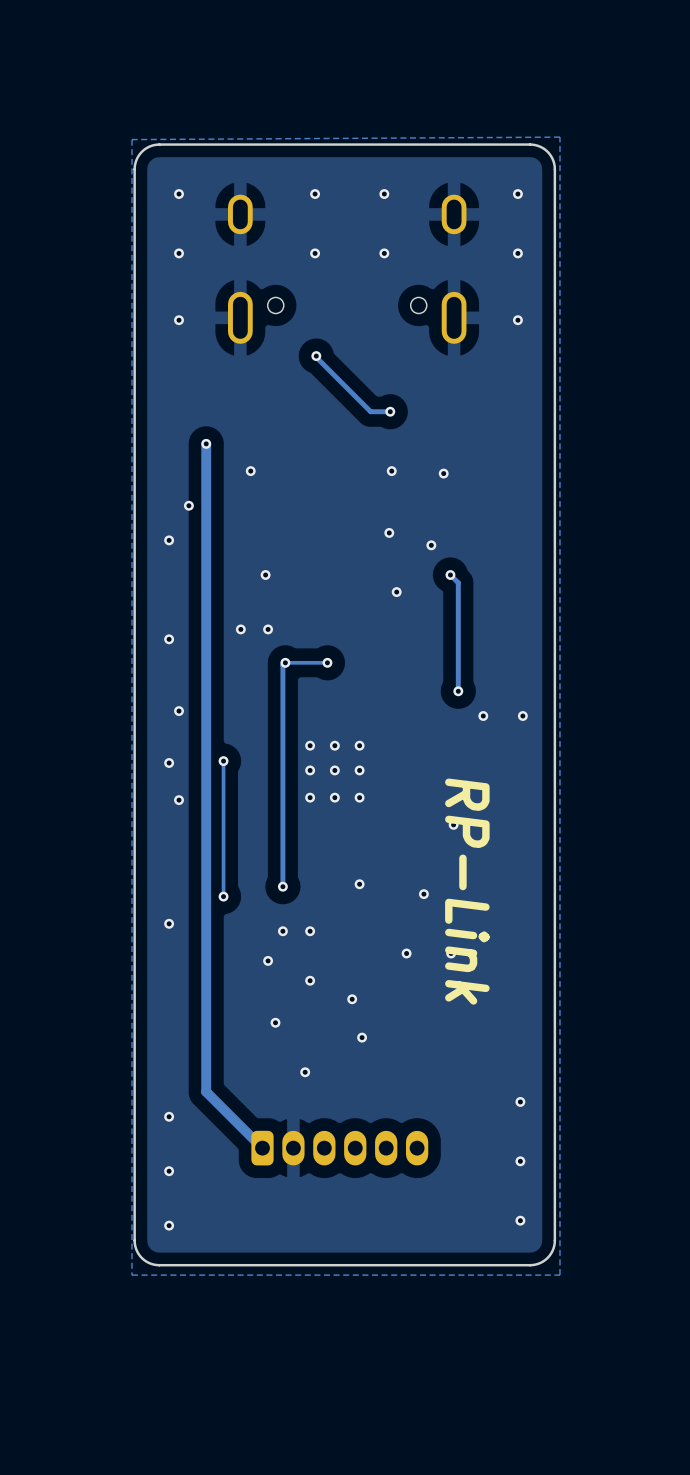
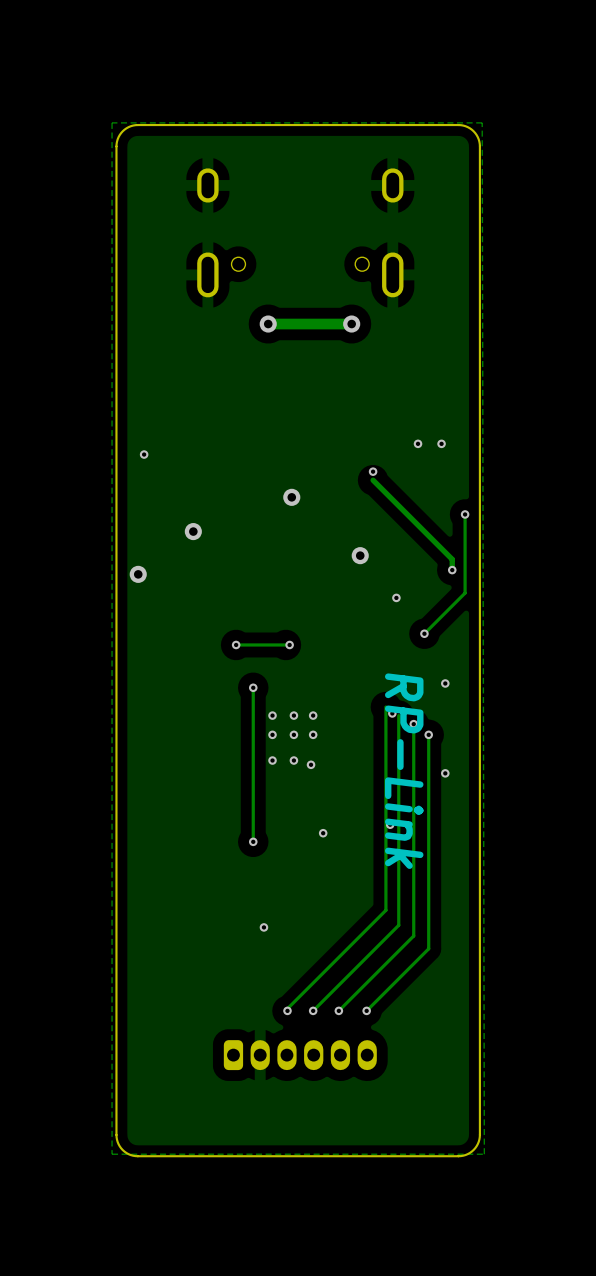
zone outline: (559, 137) (559, 1275) (132, 1275) (132, 139) (559, 137) -> (482, 122) (484, 1154) (112, 1154) (112, 122) (482, 122)
via: (179, 194) -> none
via: (315, 194) -> none
via: (384, 194) -> none
via: (517, 194) -> none
via: (179, 253) -> none
via: (315, 253) -> none
via: (384, 253) -> none
via: (517, 253) -> none
via: (179, 320) -> none
via: (517, 320) -> none
track: (316, 356) (370, 411) (390, 411) -> none
via: (316, 356) -> none
via: none -> (268, 324)
track: none -> (351, 324) (268, 324)
via: none -> (351, 324)
via: (390, 411) -> none
track: (206, 443) (206, 1091) (262, 1148) -> none
via: (206, 443) -> none
via: (250, 471) -> none
via: (391, 471) -> none
via: (443, 473) -> none
via: (188, 505) -> none
via: none -> (418, 443)
via: none -> (441, 443)
via: none -> (144, 454)
via: (389, 532) -> none
via: (169, 540) -> none
track: none -> (373, 480) (452, 559) (452, 570)
via: (265, 575) -> none
via: none -> (291, 497)
track: (450, 575) (458, 582) (458, 691) -> none
via: (450, 575) -> none
via: (396, 592) -> none
track: none -> (465, 514) (465, 593) (424, 633)
via: none -> (465, 514)
via: none -> (193, 531)
via: (240, 629) -> none
via: (268, 629) -> none
via: (169, 639) -> none
via: none -> (360, 555)
via: none -> (452, 570)
via: (285, 662) -> none
track: (327, 662) (285, 662) (282, 665) (282, 886) -> none
via: (327, 662) -> none
via: none -> (138, 574)
via: (179, 711) -> none
via: (483, 716) -> none
via: (522, 716) -> none
via: none -> (424, 633)
via: none -> (236, 644)
via: (310, 745) -> none
track: none -> (285, 644) (236, 644)
via: (359, 745) -> none
track: (223, 761) (223, 896) -> none
via: (223, 761) -> none
via: (169, 763) -> none
via: (310, 770) -> none
via: (334, 770) -> none
via: (359, 770) -> none
via: none -> (445, 683)
track: none -> (253, 687) (253, 841)
via: none -> (253, 687)
via: (310, 797) -> none
via: (334, 797) -> none
via: (359, 797) -> none
via: (179, 800) -> none
track: none -> (385, 707) (385, 910) (287, 1010)
via: none -> (272, 715)
via: none -> (293, 715)
via: none -> (313, 715)
track: none -> (398, 715) (398, 925) (313, 1010)
track: none -> (413, 724) (413, 935) (338, 1010)
via: none -> (413, 724)
via: none -> (272, 734)
via: none -> (293, 734)
via: none -> (313, 734)
track: none -> (428, 734) (428, 948) (366, 1010)
via: none -> (428, 734)
via: none -> (272, 760)
via: none -> (293, 760)
via: (282, 886) -> none
via: (423, 894) -> none
via: none -> (445, 773)
via: (223, 896) -> none
via: (169, 923) -> none
via: (282, 931) -> none
via: (310, 931) -> none
via: (406, 953) -> none
via: (268, 960) -> none
via: none -> (323, 833)
via: none -> (253, 841)
via: (310, 980) -> none
via: (352, 999) -> none
via: (275, 1022) -> none
via: (362, 1037) -> none
via: (520, 1101) -> none
via: (169, 1116) -> none
part position: (339, 1148) -> (300, 1055)
via: (520, 1161) -> none
via: none -> (287, 1010)
via: none -> (313, 1010)
via: none -> (338, 1010)
via: none -> (366, 1010)
via: (169, 1171) -> none
via: (520, 1220) -> none
via: (169, 1225) -> none
board edge: (554, 1240) (553, 1248) (547, 1257) (540, 1262) (530, 1265) (156, 1265) (141, 1258) (136, 1248) (134, 1240) -> (479, 1072) (479, 1139) (471, 1151) (458, 1156) (133, 1155) (122, 1150) (117, 1139) (116, 1073)

